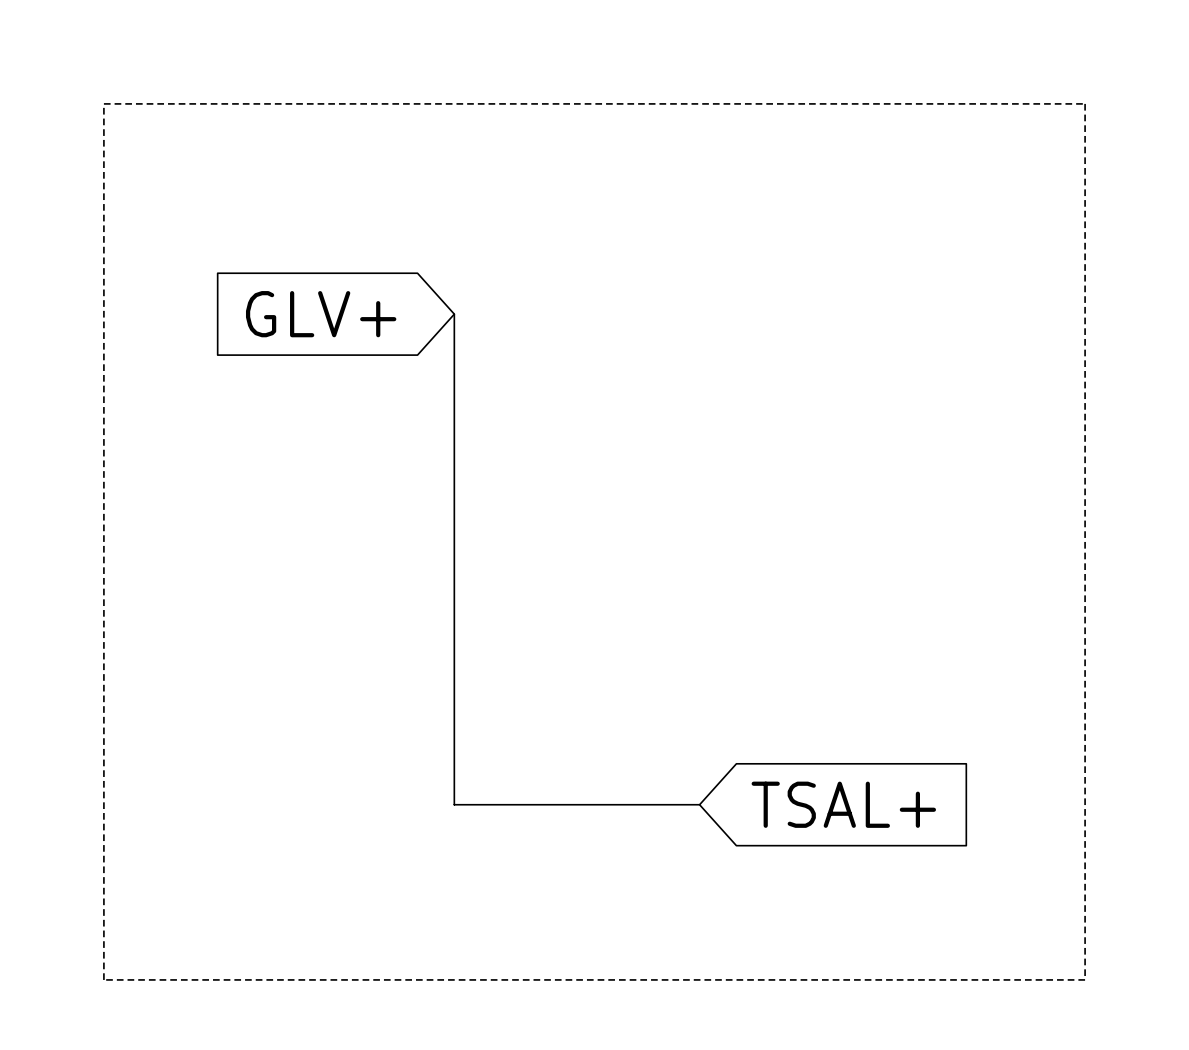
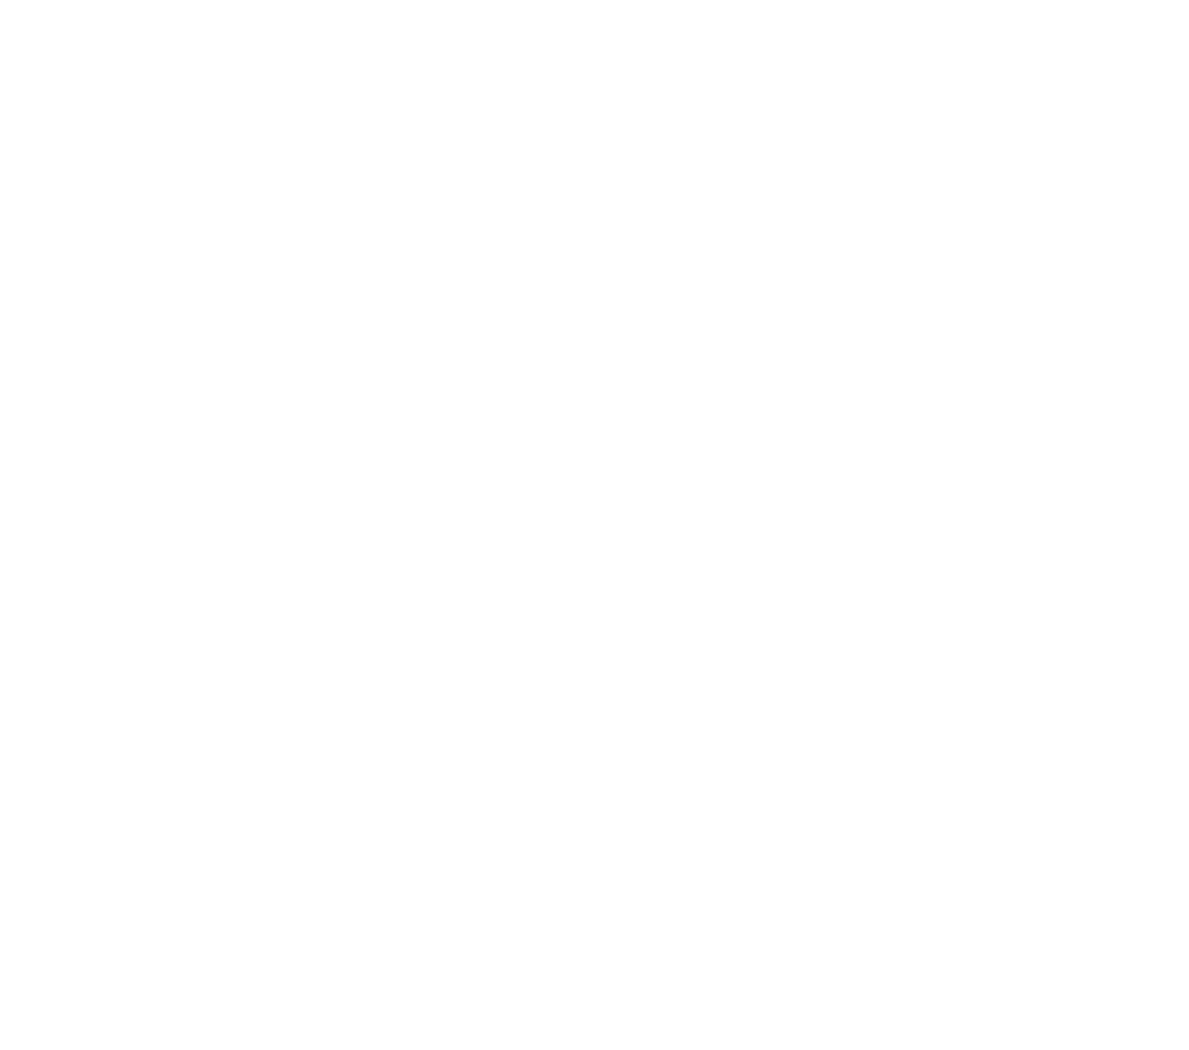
line: (103, 103) (1085, 103) (1085, 979) (103, 979) (103, 103) -> none
global label: GLV+ (321, 314) -> none
wire: (454, 314) (454, 804) (699, 804) -> none
global label: TSAL+ (843, 804) -> none

